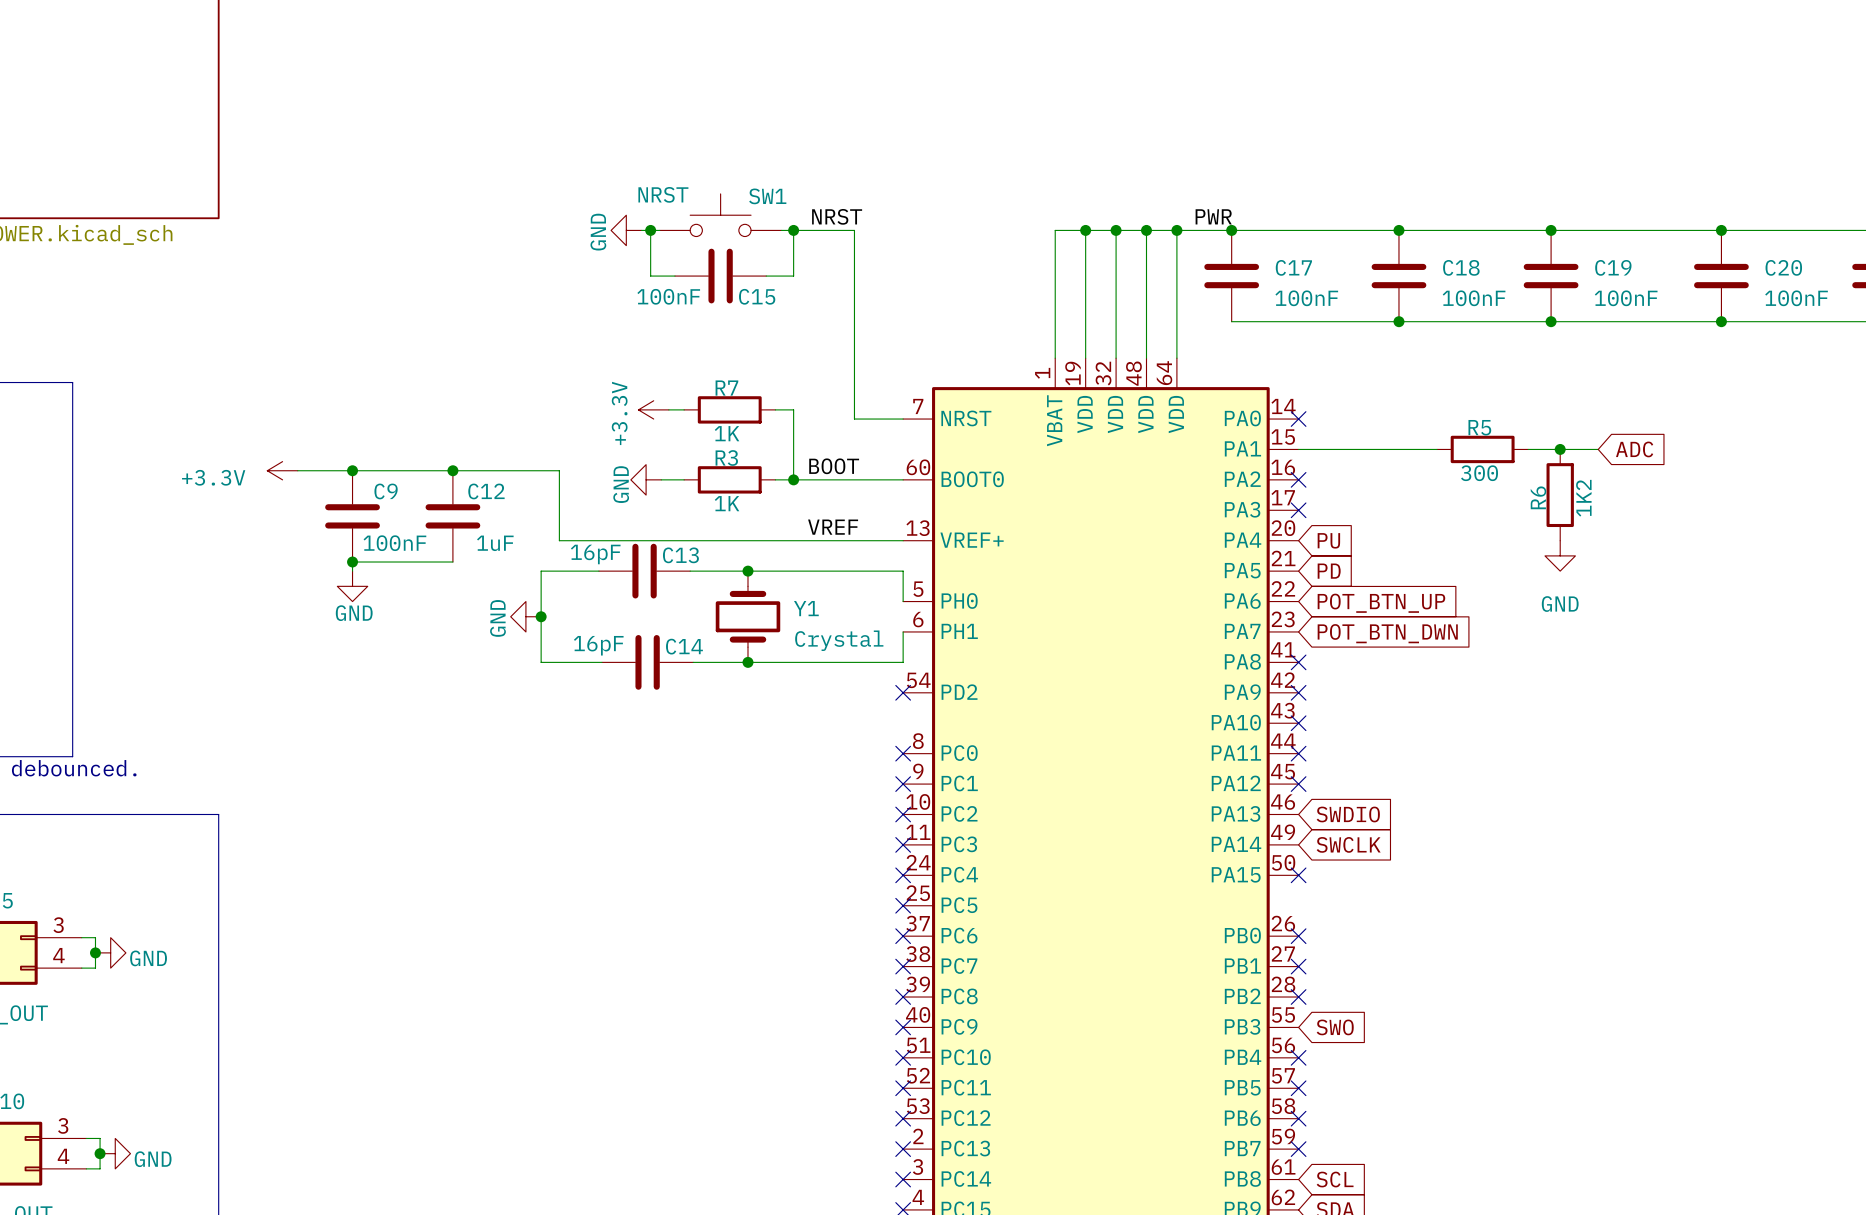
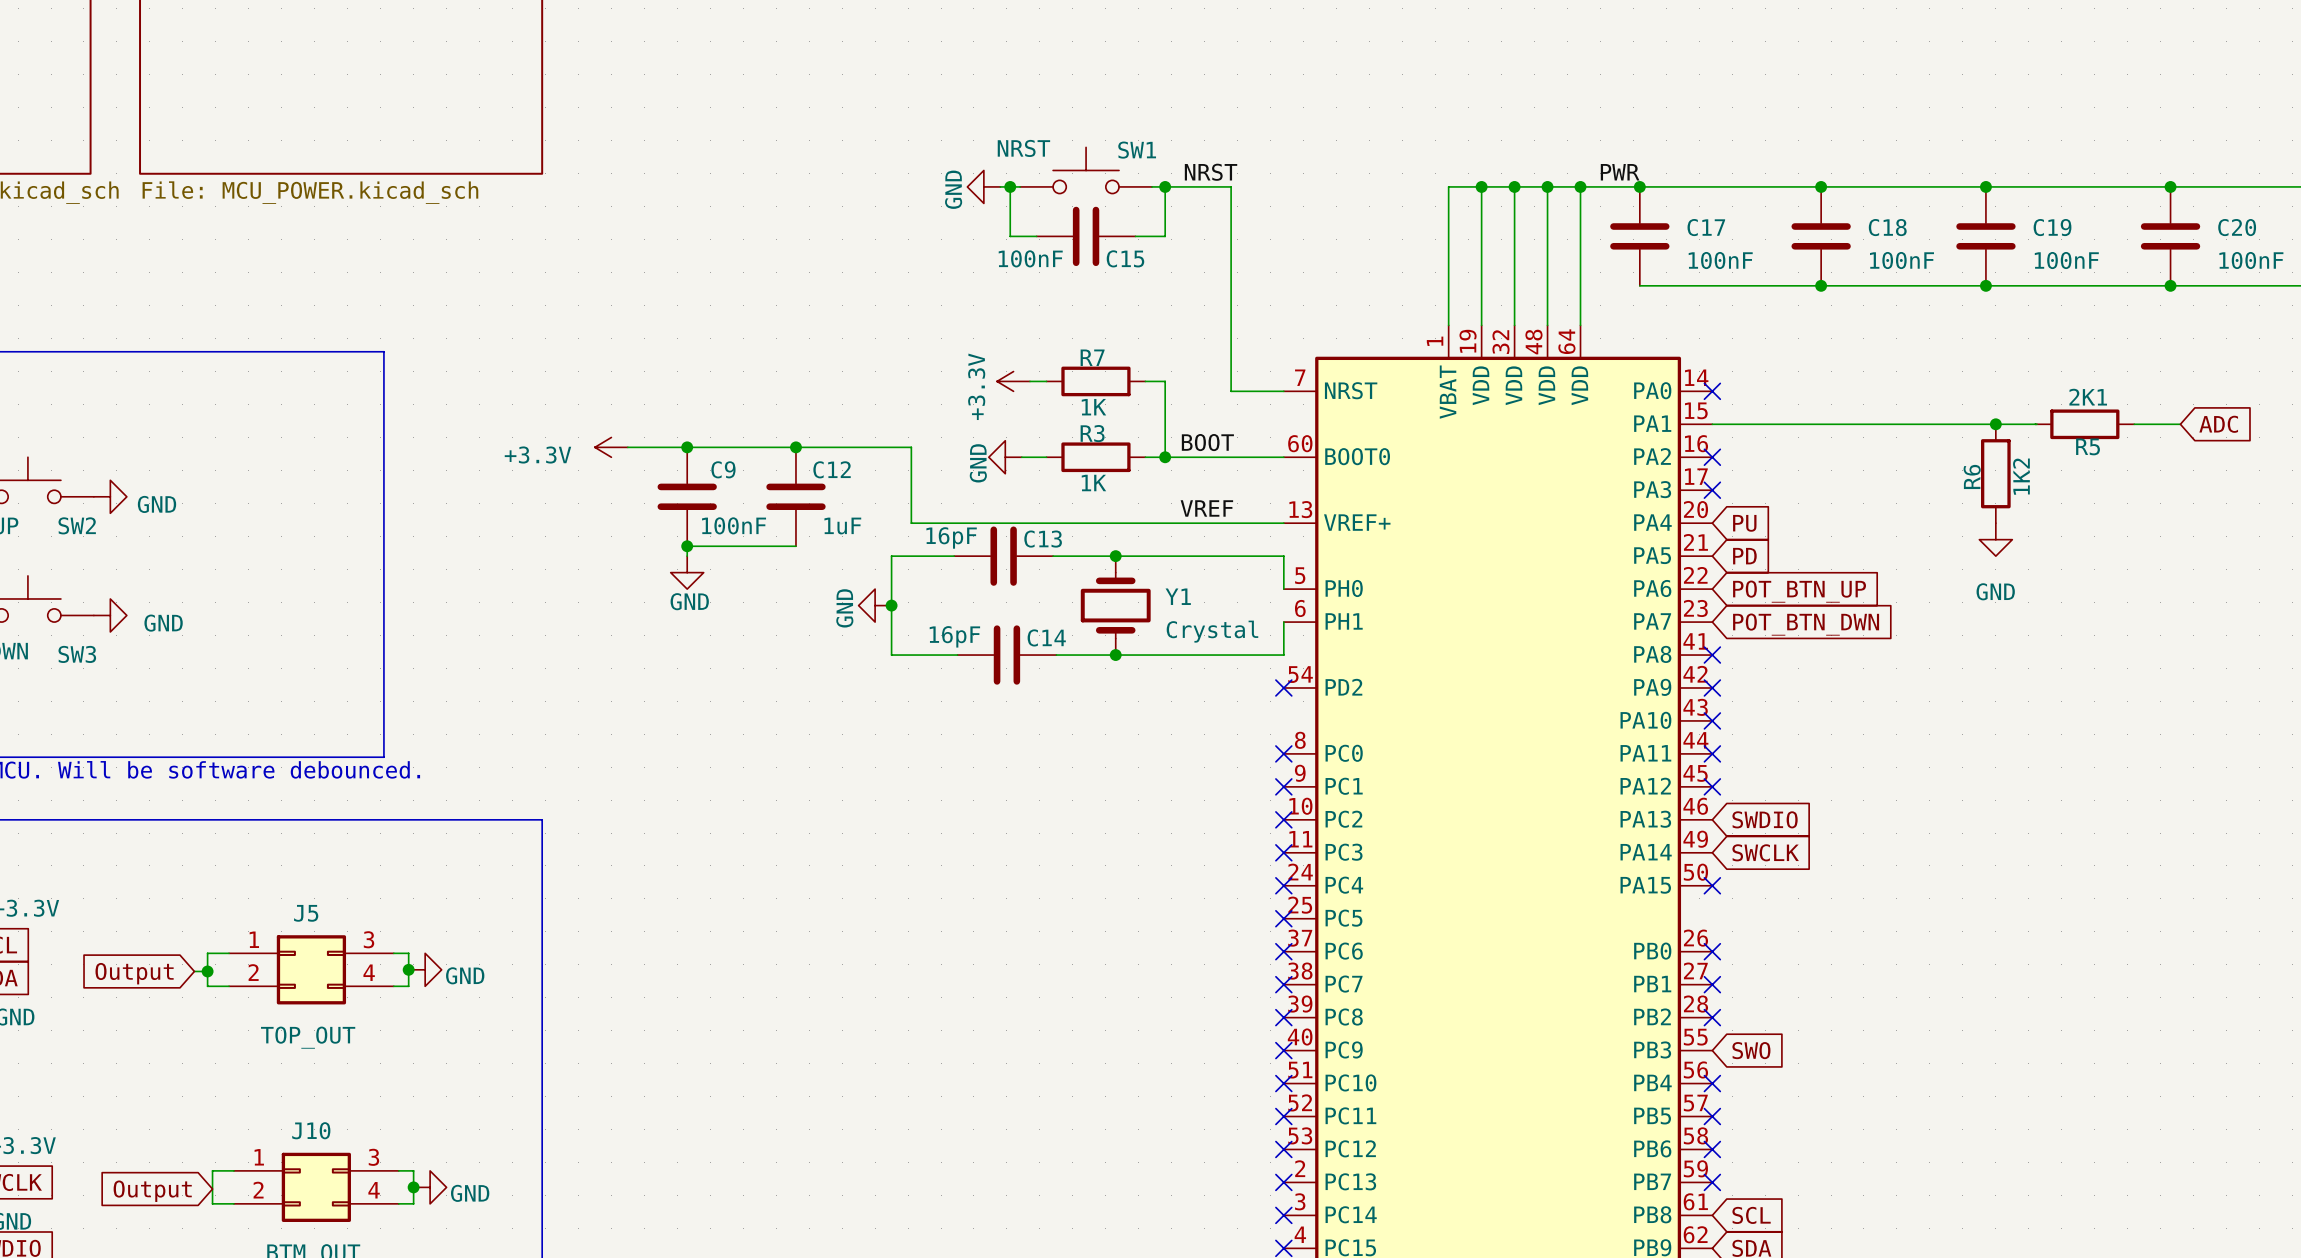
R5 name position: R5 (1479, 427) -> R5 (2088, 446)
wire: none -> (1862, 424) (1961, 424)
R5 position: (1482, 449) -> (2084, 424)
global label position: ADC (1634, 449) -> ADC (2218, 424)
wire: none -> (2134, 424) (2180, 424)
R5 value: 300 (1479, 473) -> 2K1 (2088, 397)

